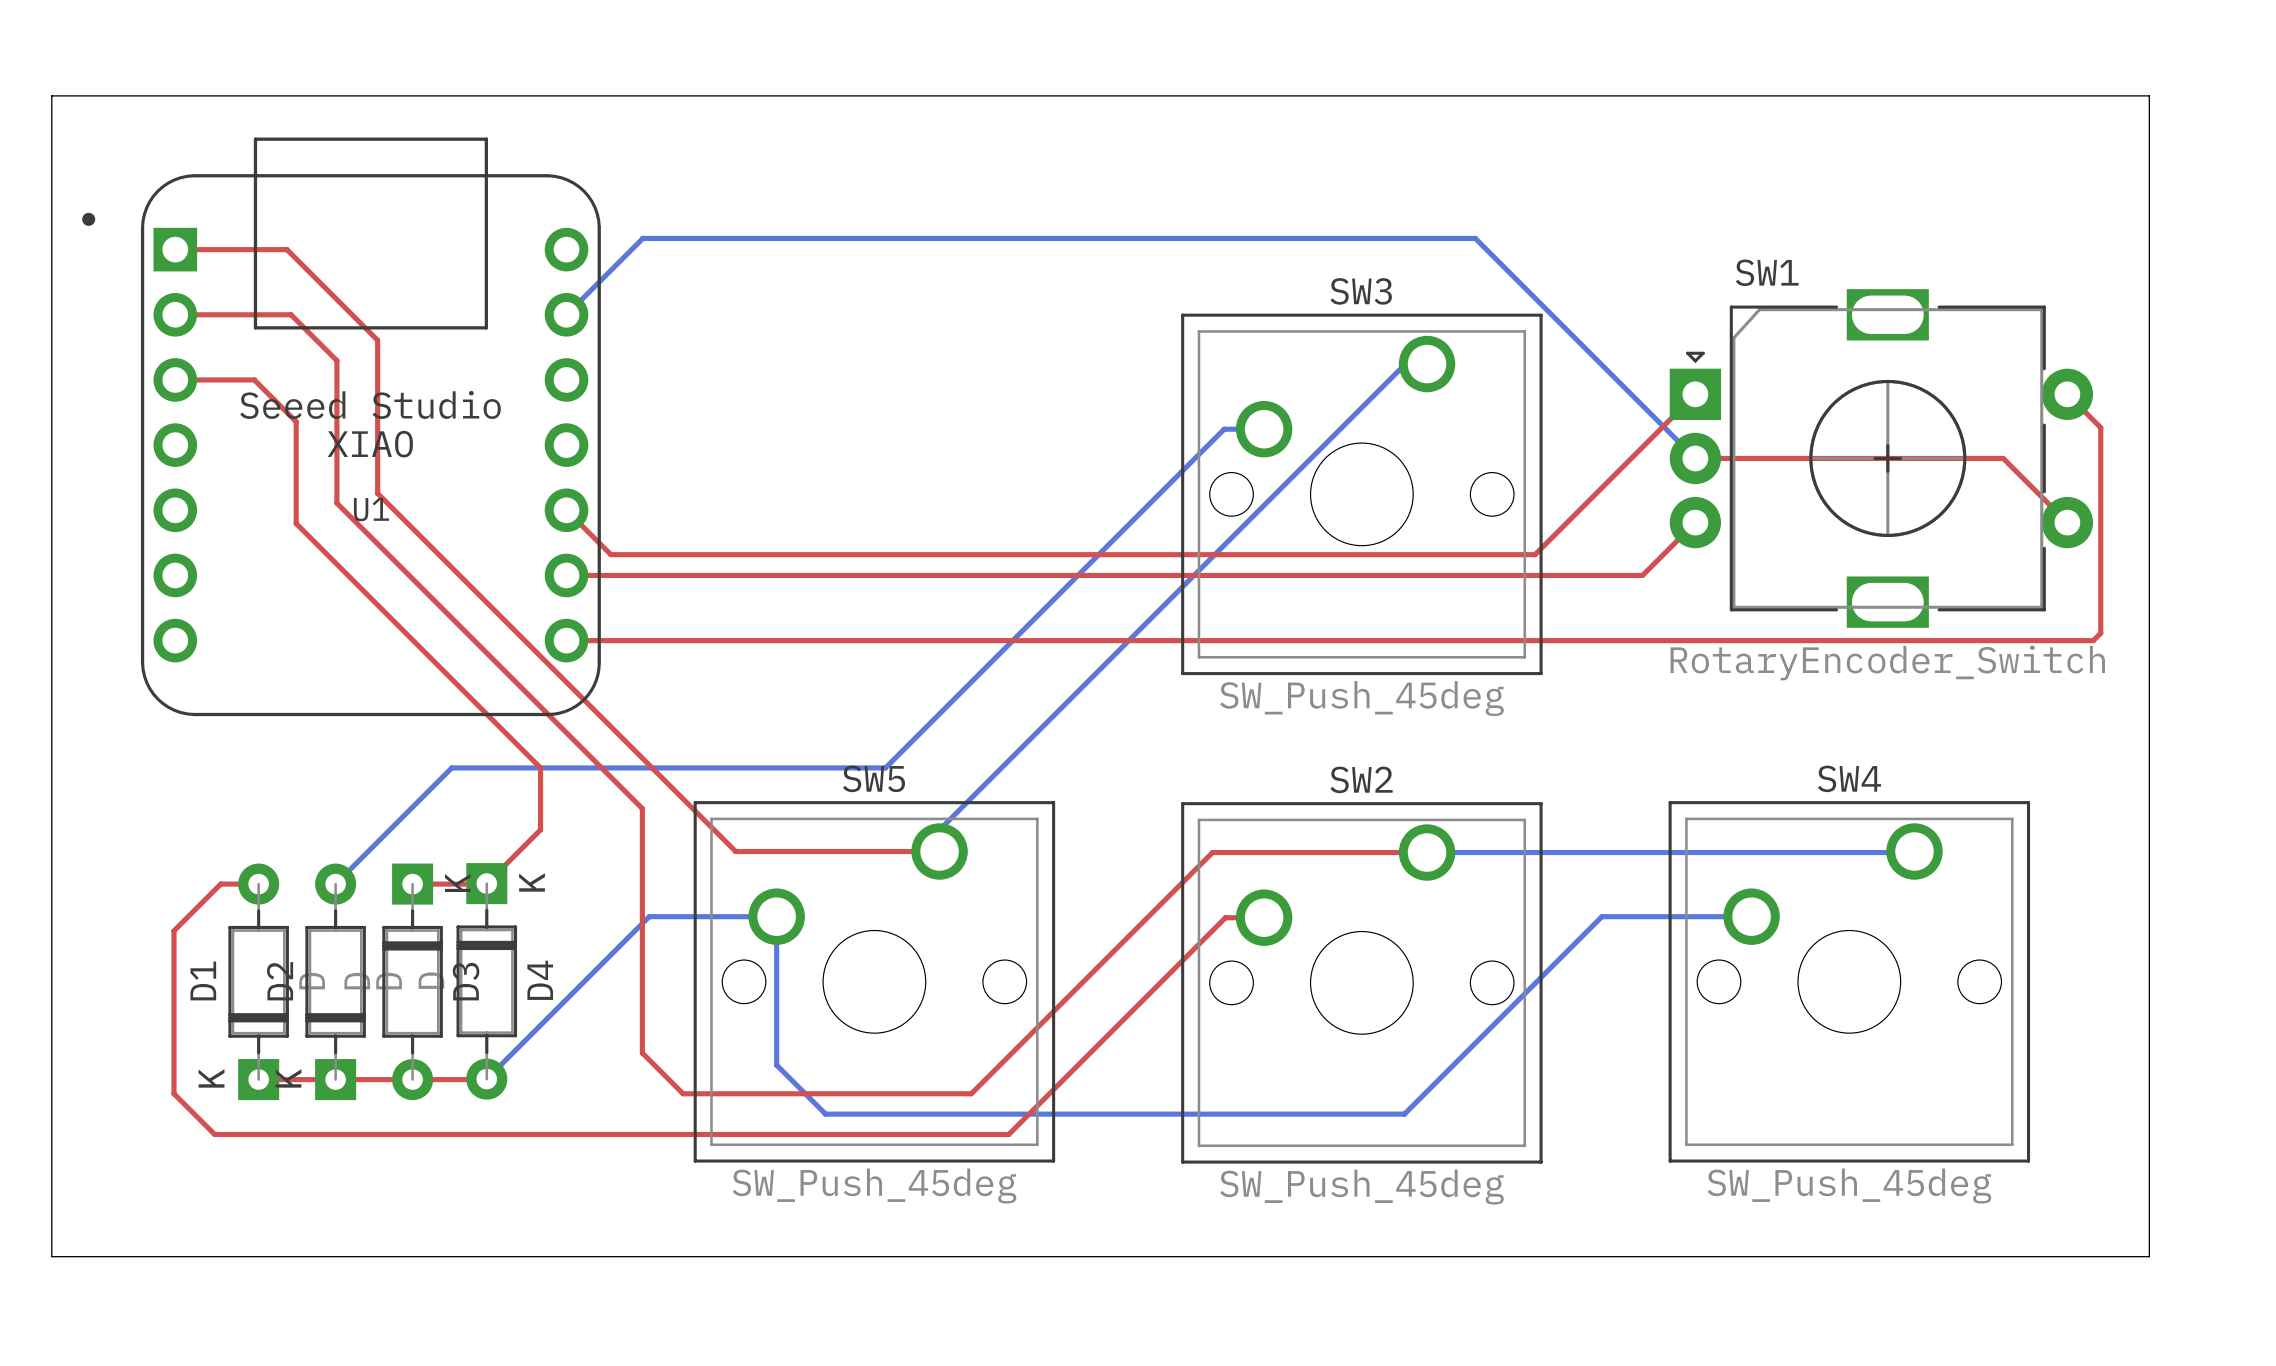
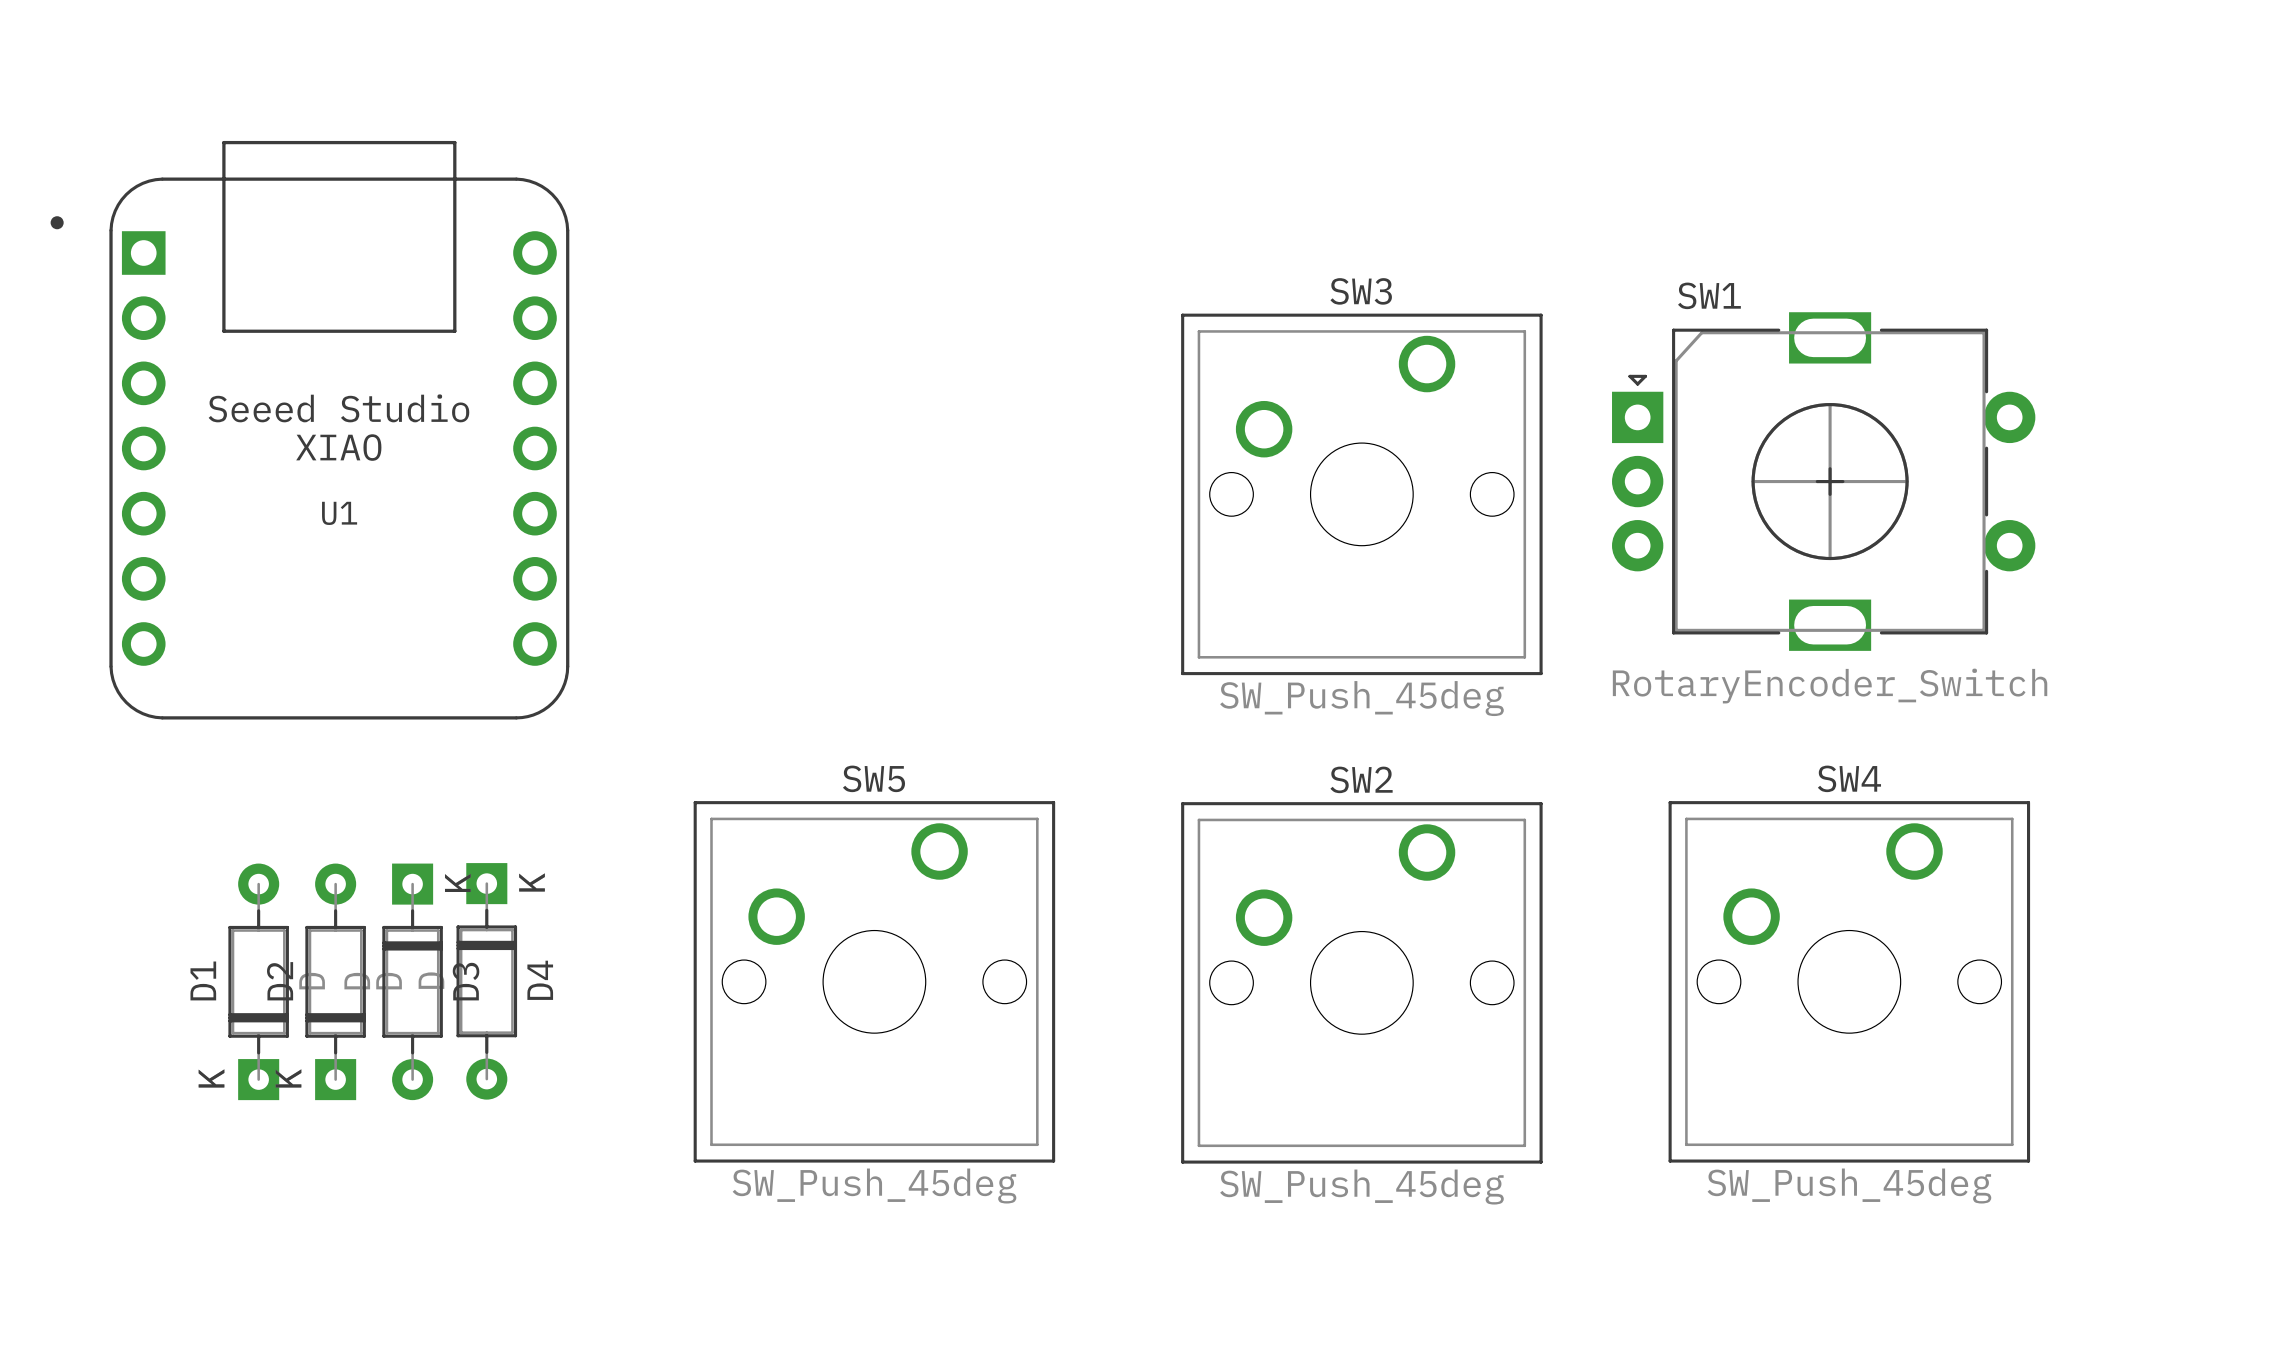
board edge: (51, 95) (2149, 95) (2149, 1256) (51, 1256) (51, 95) -> none
top track: (175, 249) (286, 249) (377, 340) (377, 493) (735, 851) (939, 851) -> none
top track: (175, 314) (291, 314) (336, 360) (336, 503) (642, 808) (642, 1053) (683, 1093) (971, 1093) (1212, 852) (1427, 852) -> none
bottom track: (566, 314) (642, 238) (1475, 238) (1695, 458) -> none
bottom track: (1427, 364) (1405, 364) (939, 829) (939, 851) -> none
top track: (175, 379) (254, 379) (296, 421) (296, 523) (540, 767) (540, 829) (486, 884) (412, 884) -> none
top track: (1695, 394) (1535, 554) (610, 554) (566, 510) -> none
top track: (2067, 394) (2100, 427) (2100, 633) (2093, 640) (566, 640) -> none
U1 position: (341, 426) -> (309, 430)
bottom track: (1264, 429) (1224, 429) (885, 767) (451, 767) (335, 884) -> none
top track: (1695, 458) (2003, 458) (2067, 522) -> none
SW1 position: (1881, 458) -> (1823, 481)
top track: (1695, 522) (1642, 575) (566, 575) -> none
bottom track: (1914, 851) (1427, 852) -> none
top track: (258, 884) (220, 884) (174, 930) (174, 1093) (214, 1134) (1008, 1134) (1225, 917) (1264, 917) -> none
bottom track: (1751, 916) (1601, 916) (1404, 1114) (825, 1114) (776, 1065) (776, 916) (649, 916) (486, 1079) -> none
top track: (486, 1079) (258, 1079) -> none

